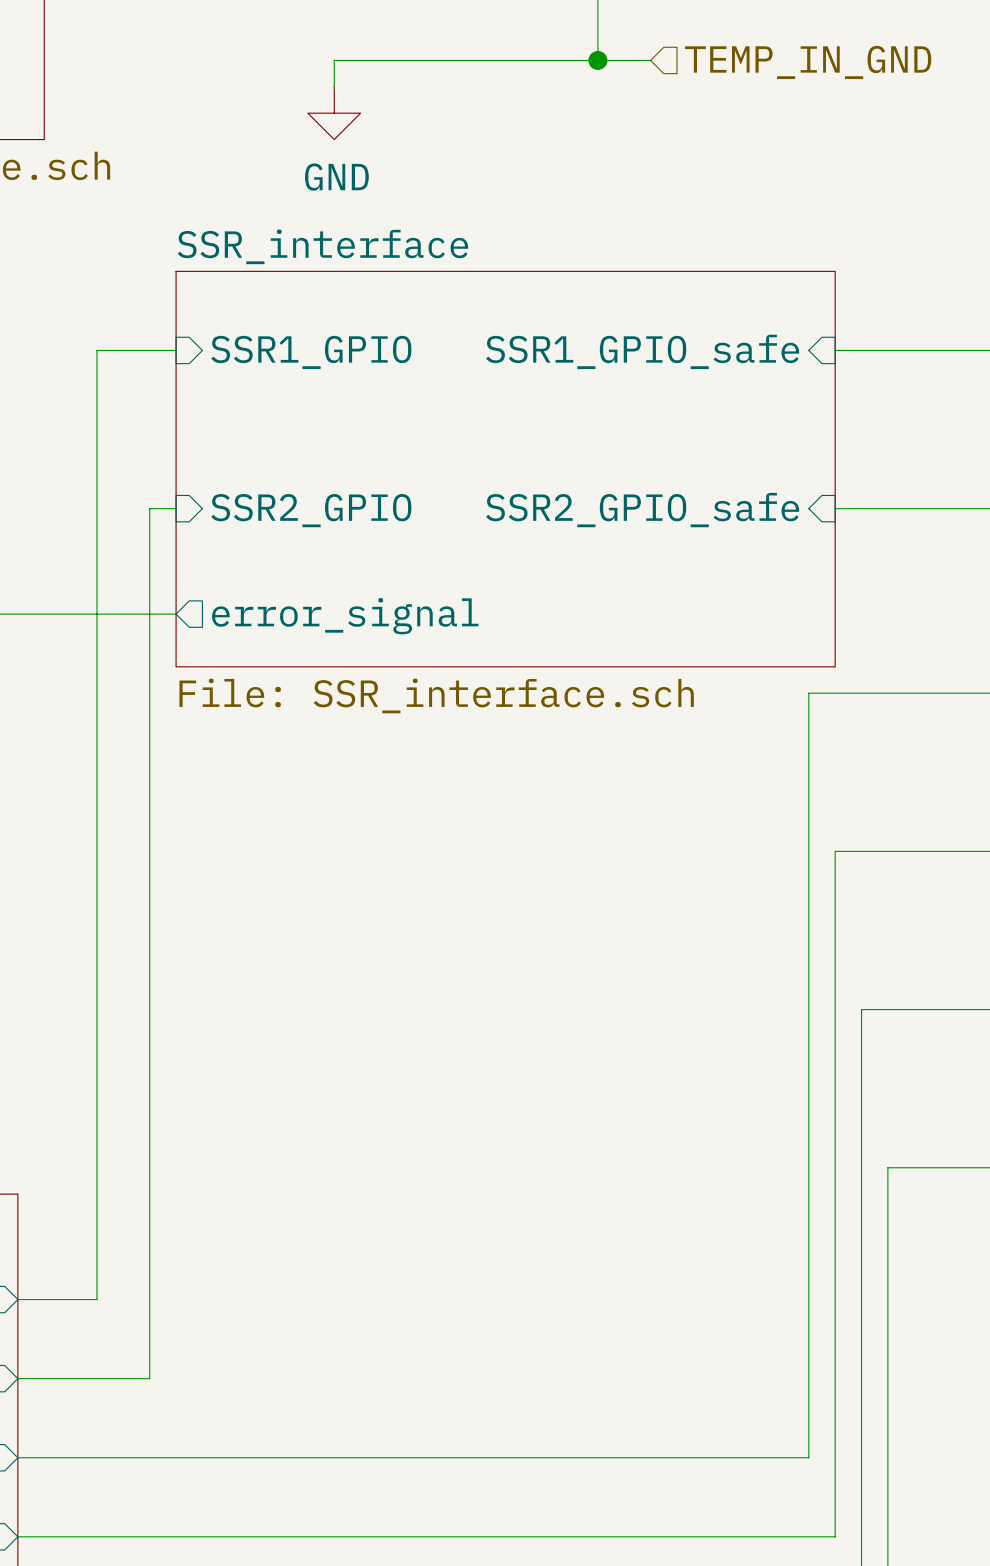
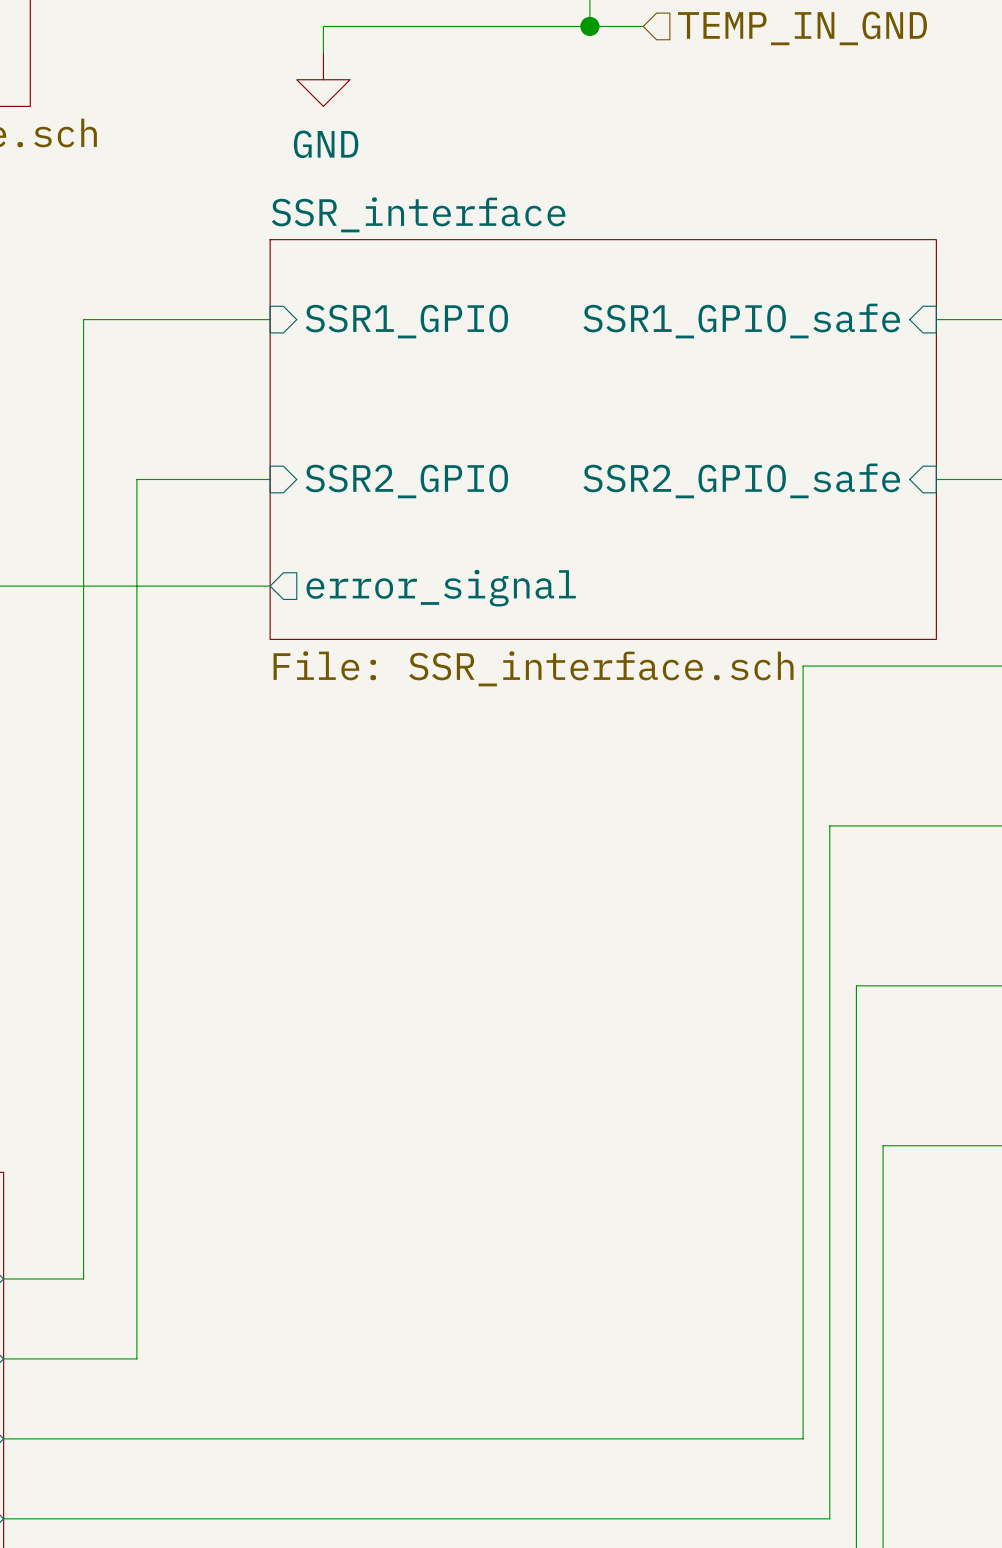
wire: none -> (163, 319) (270, 319)
wire: (835, 350) (940, 350) -> none
sheet pin position: SSR1_GPIO_safe (642, 351) -> SSR1_GPIO_safe (741, 321)
sheet pin position: SSR1_GPIO (311, 352) -> SSR1_GPIO (406, 321)
sheet SSR_interface position: (505, 469) -> (603, 439)
wire: none -> (163, 479) (270, 479)
wire: (835, 508) (940, 508) -> none
sheet pin position: SSR2_GPIO (311, 510) -> SSR2_GPIO (406, 481)
sheet pin position: SSR2_GPIO_safe (642, 510) -> SSR2_GPIO_safe (741, 480)
wire: none -> (163, 586) (270, 586)
sheet pin position: error_signal (345, 616) -> error_signal (441, 588)

